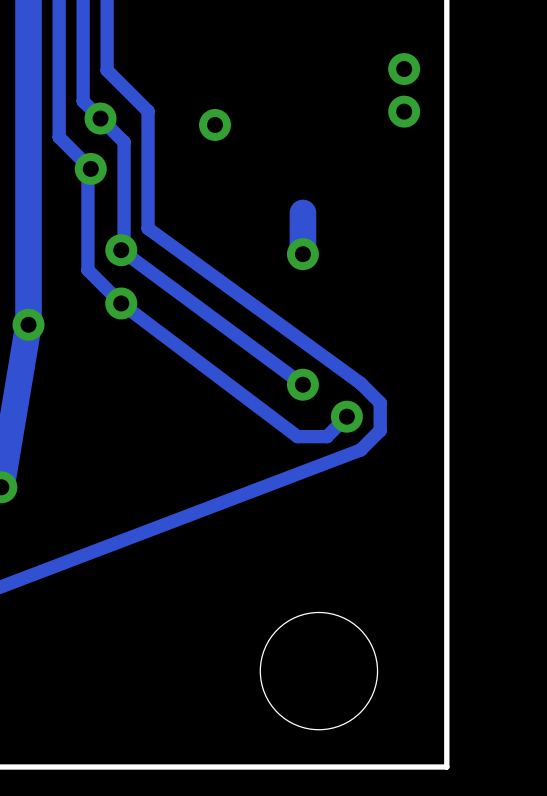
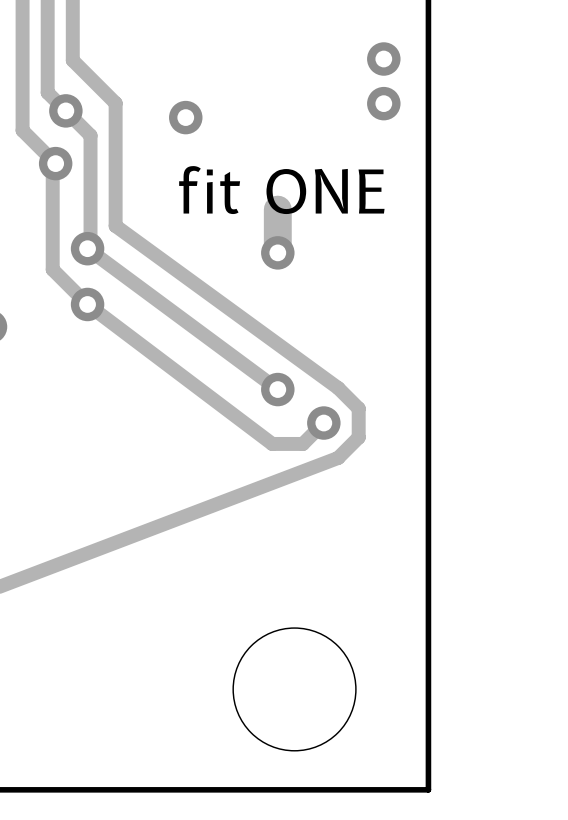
text: none -> fit ONE (281, 190)

